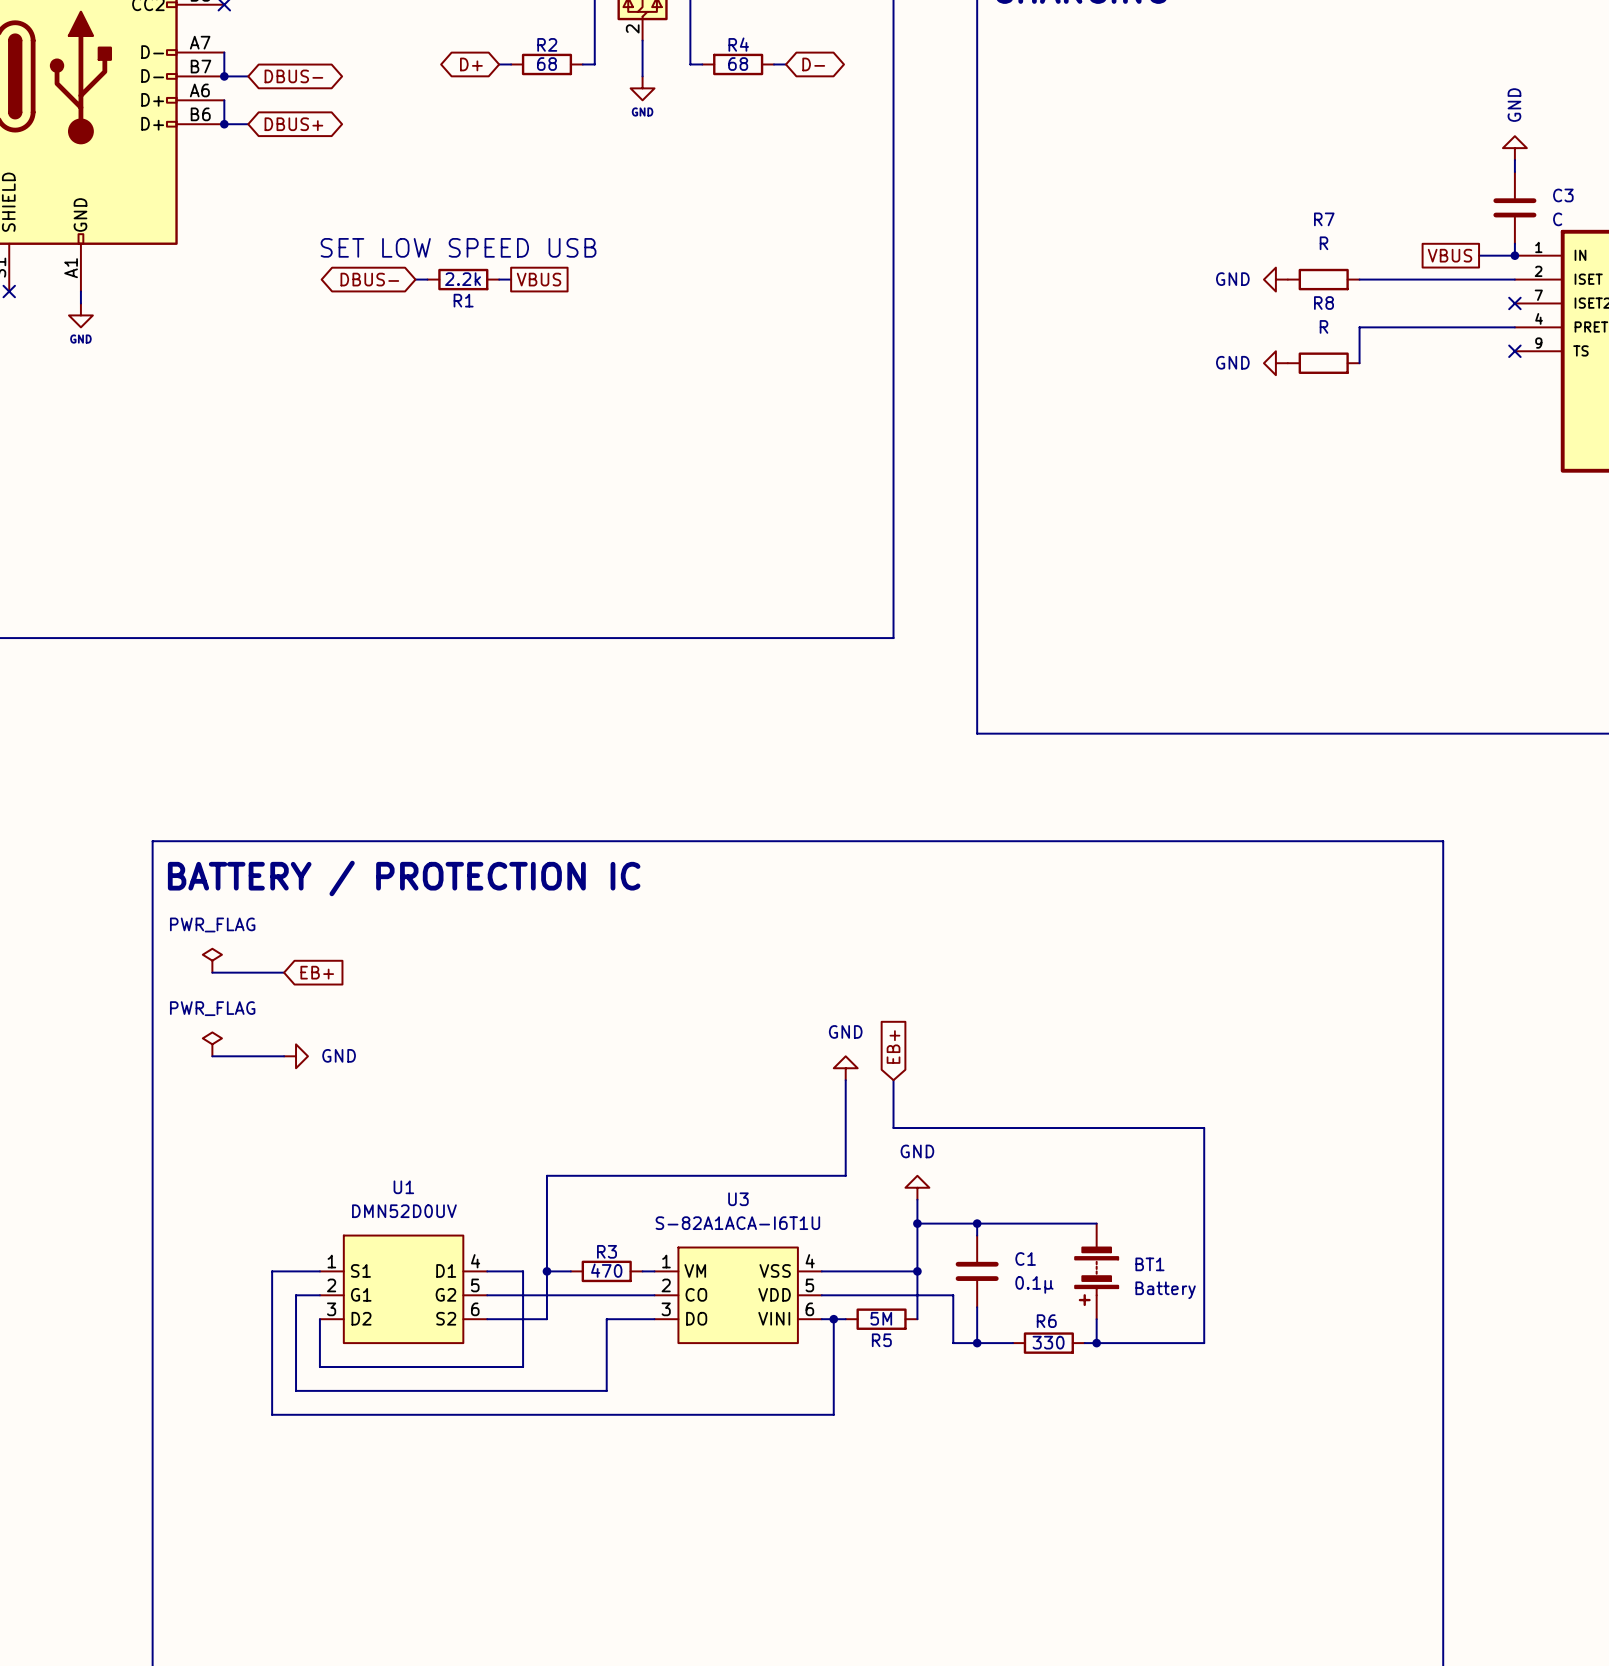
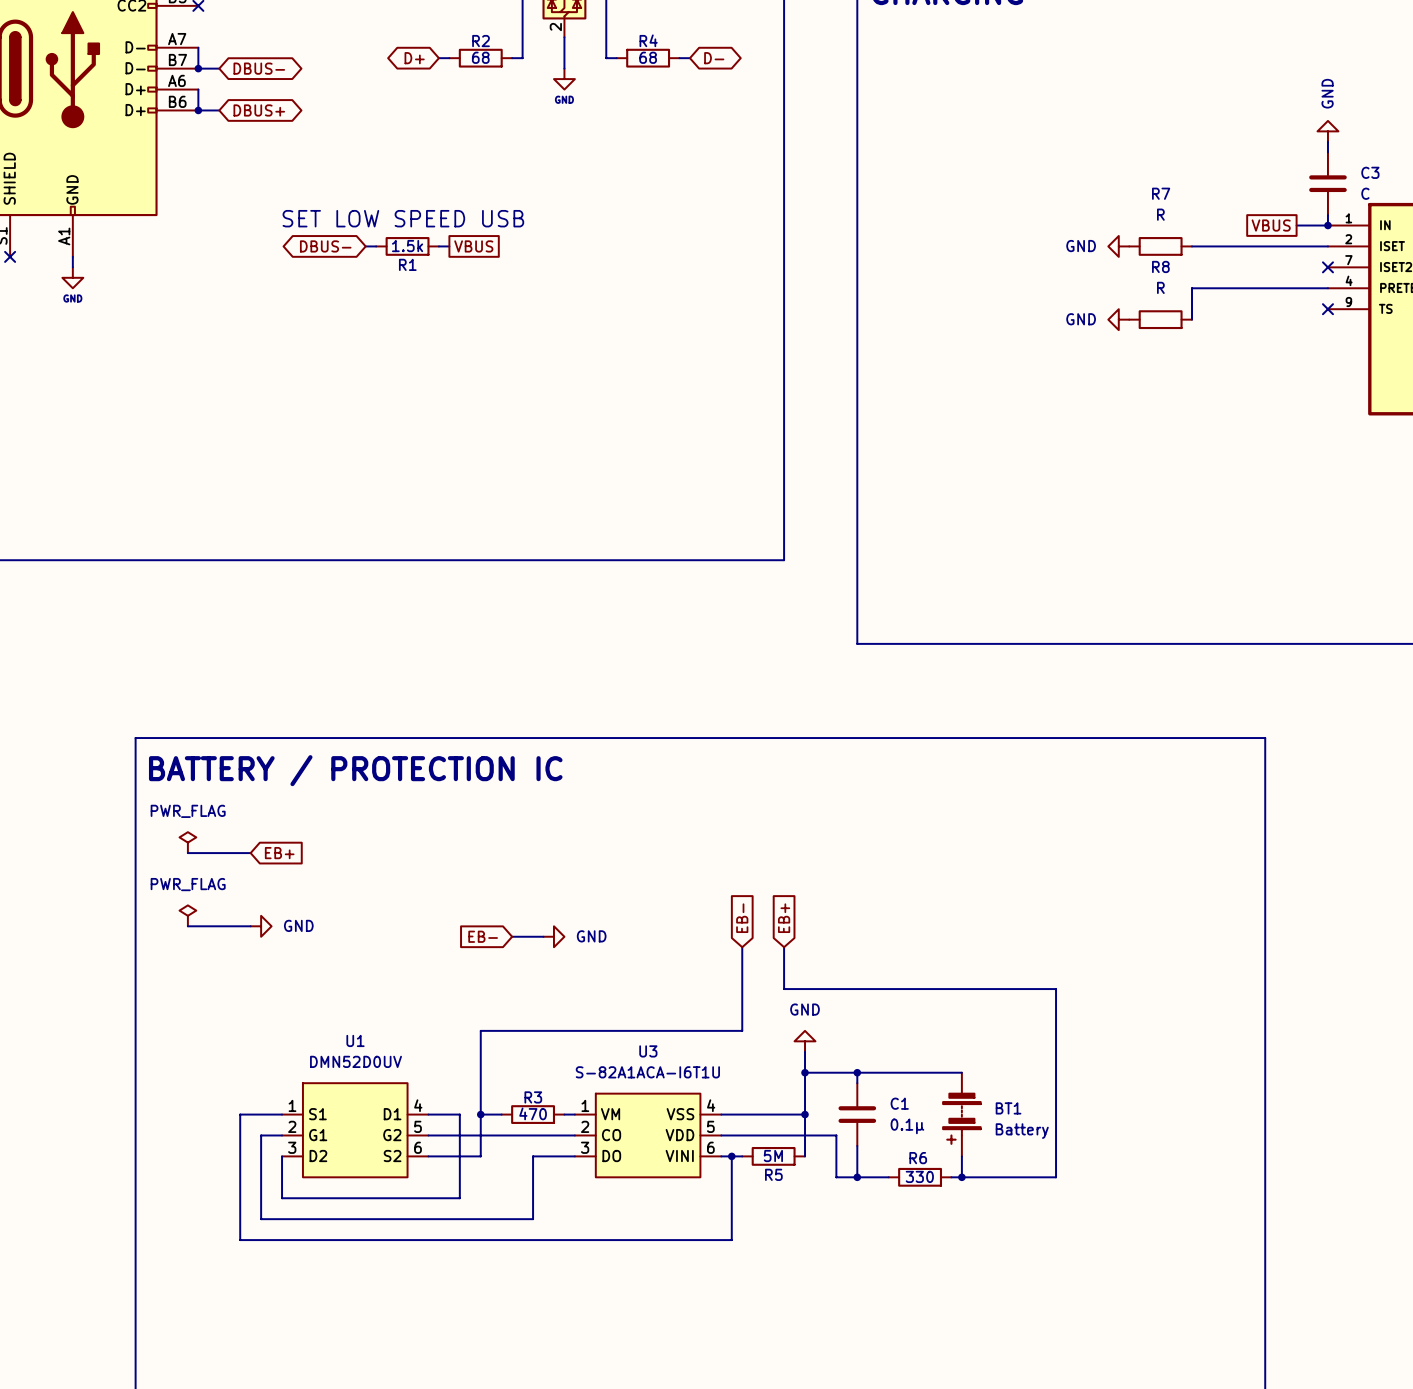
R1 value: 2.2k (463, 279) -> 1.5k (407, 246)
global label: none -> EB- (742, 918)
global label: none -> EB- (483, 936)
wire: none -> (512, 936) (543, 936)
power symbol rotation: 0° (845, 1068) -> 90° clockwise (553, 936)
power symbol position: GND (845, 1068) -> GND (553, 936)

